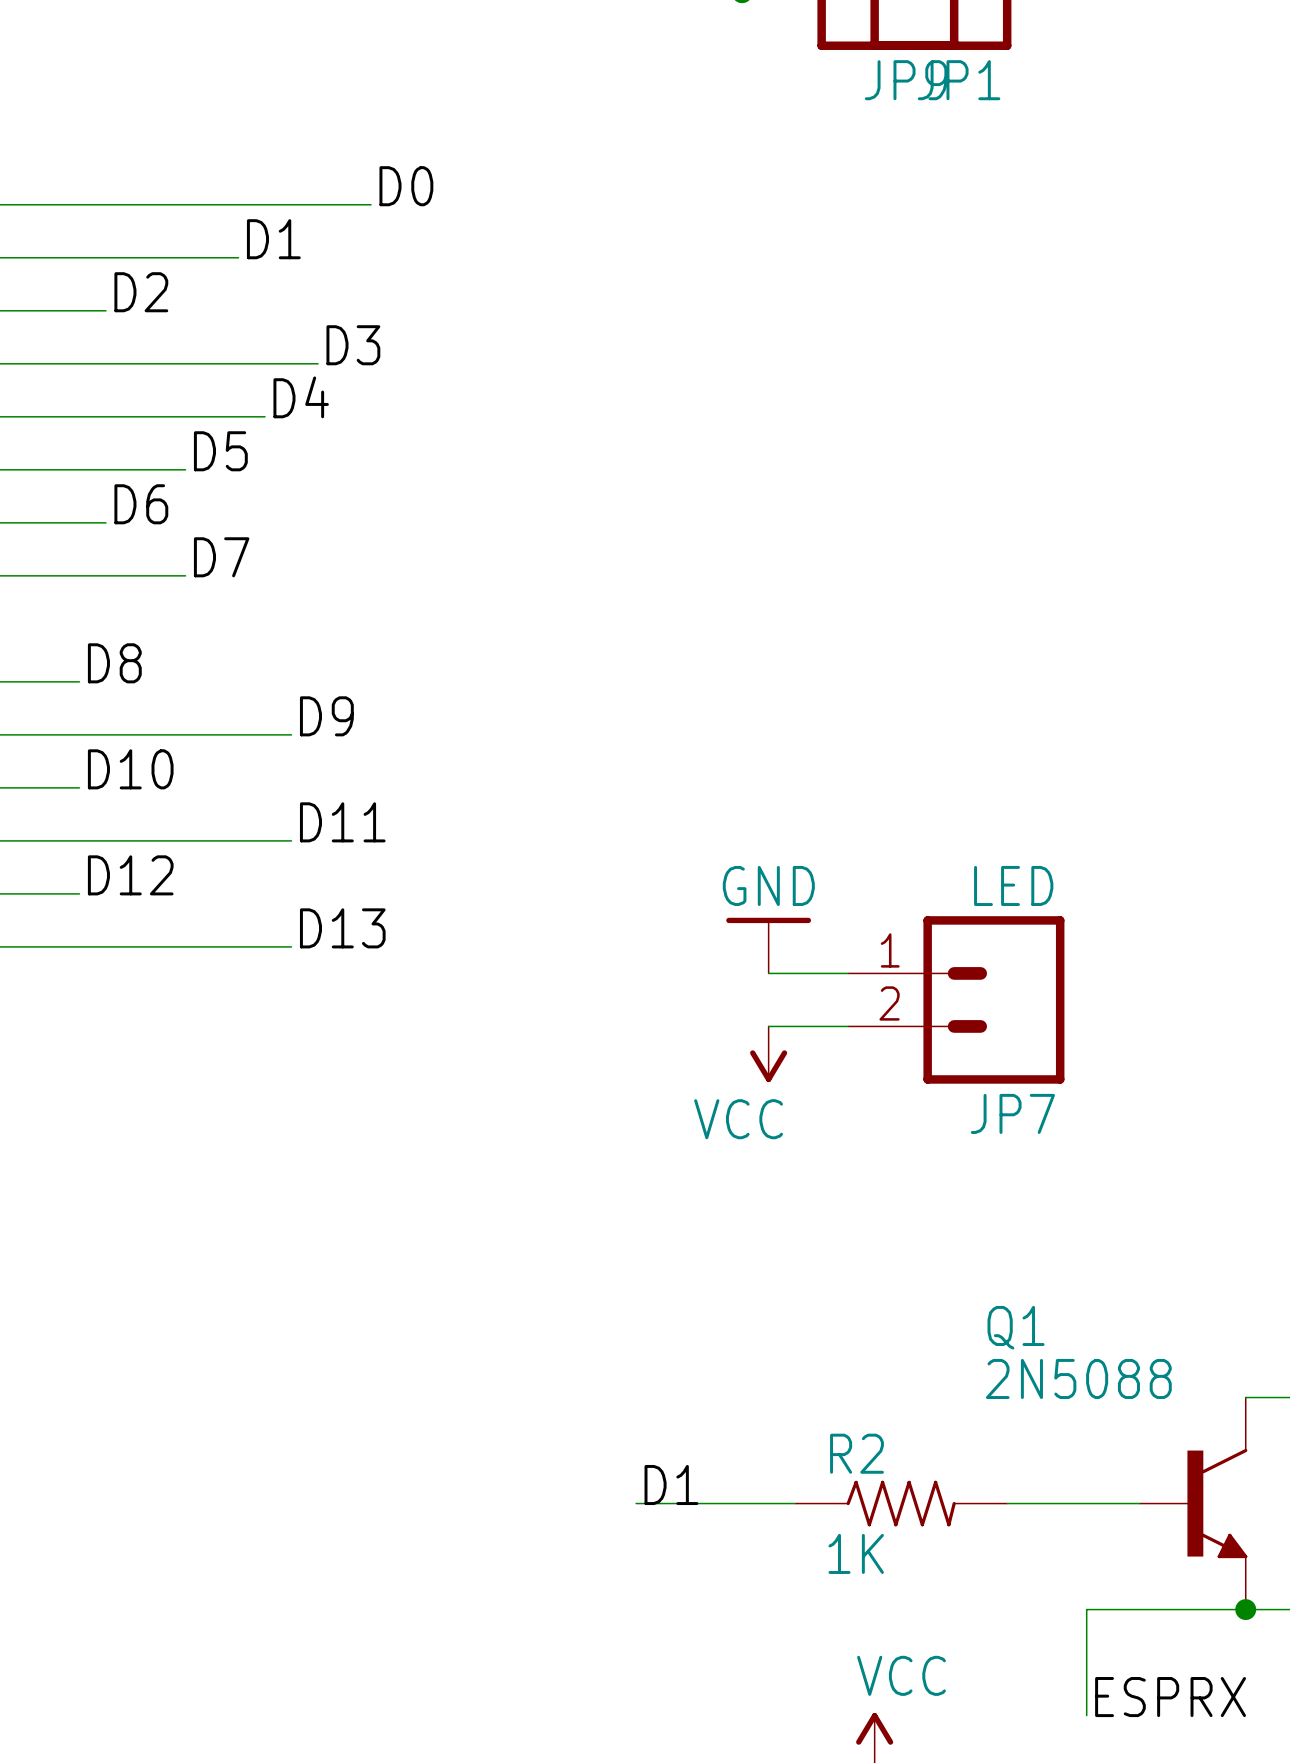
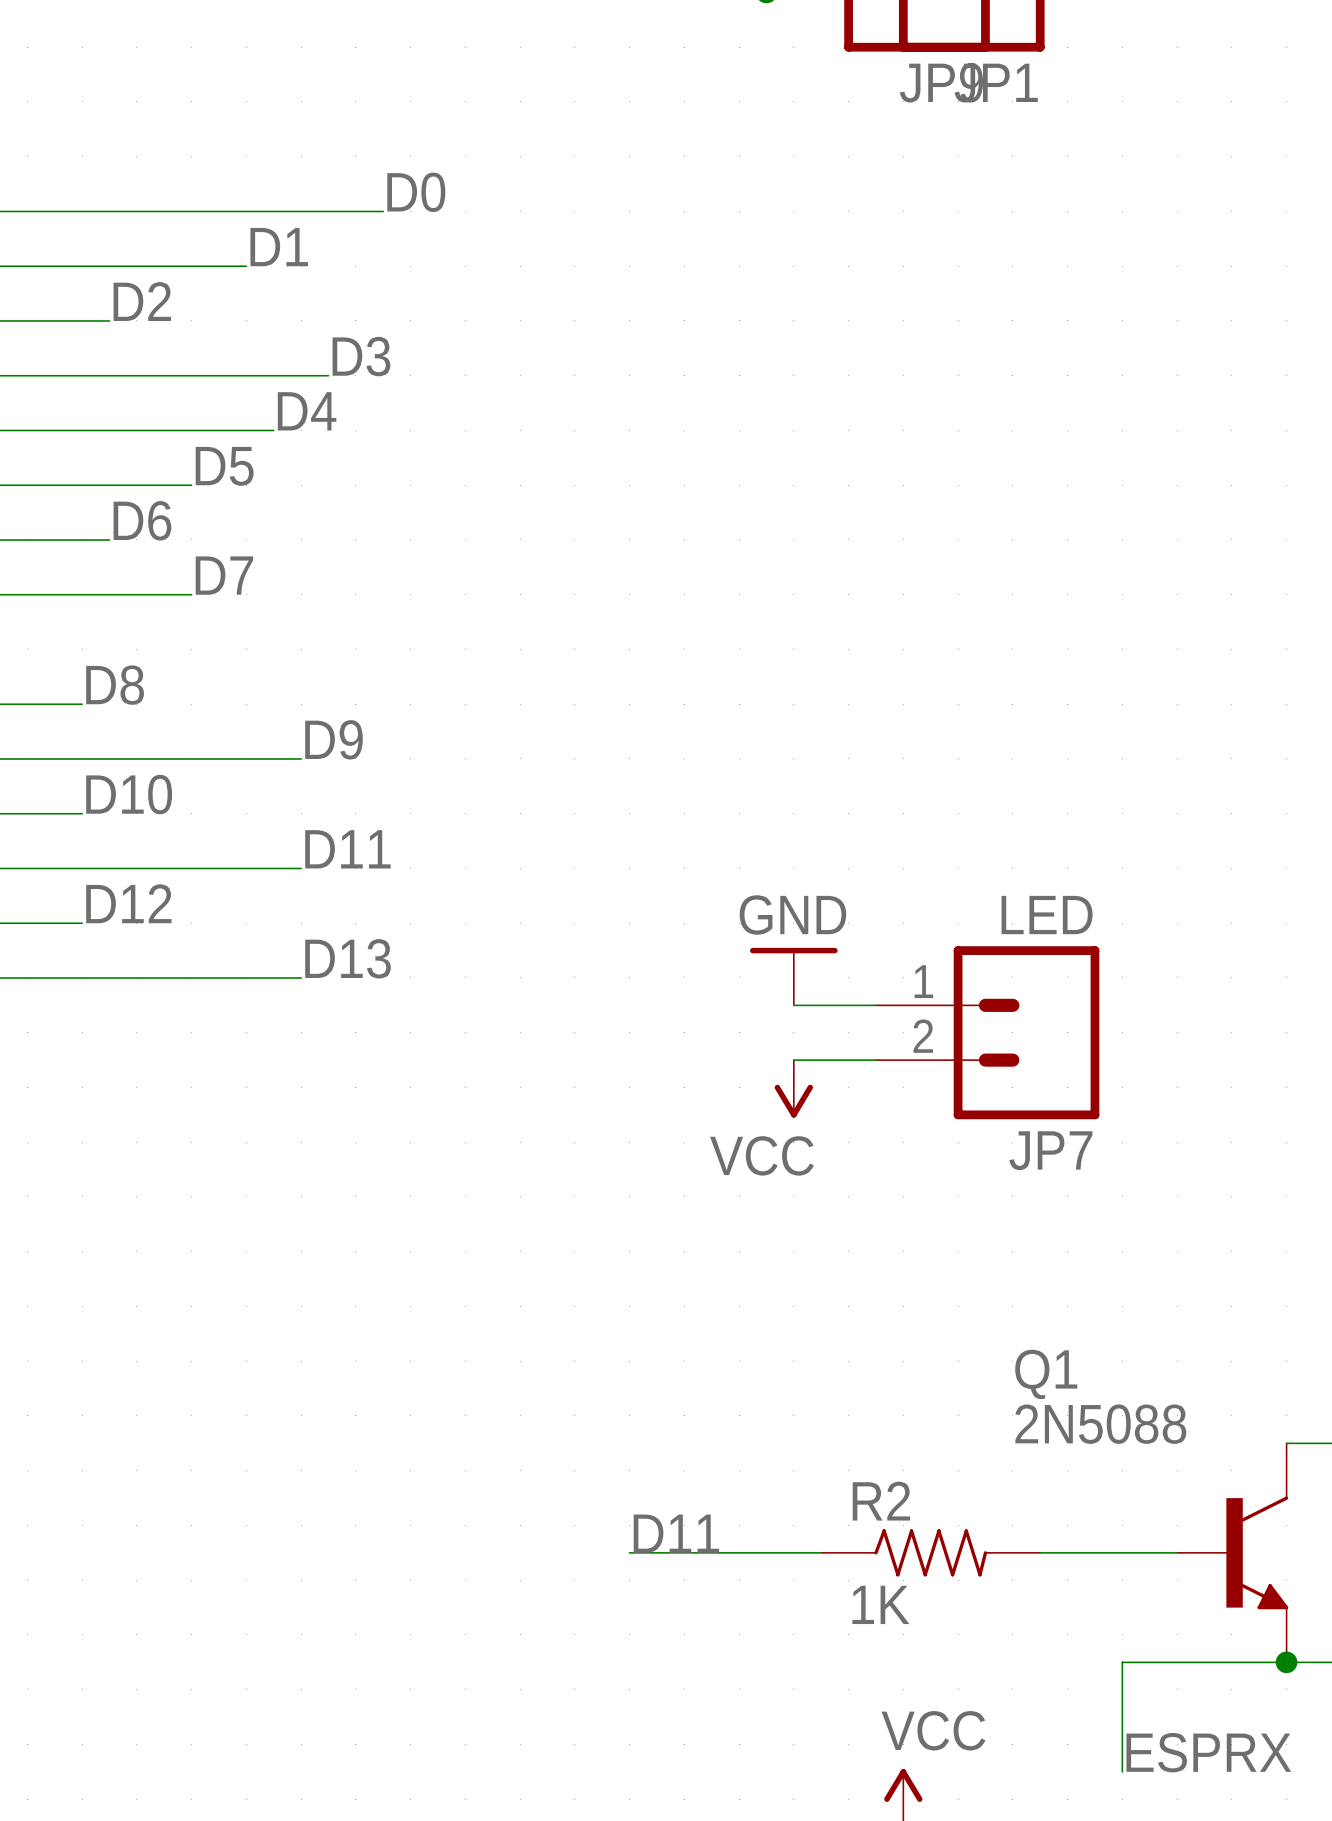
label: D1 (671, 1485) -> D11 (676, 1533)
wire: none -> (629, 1552) (656, 1552)

